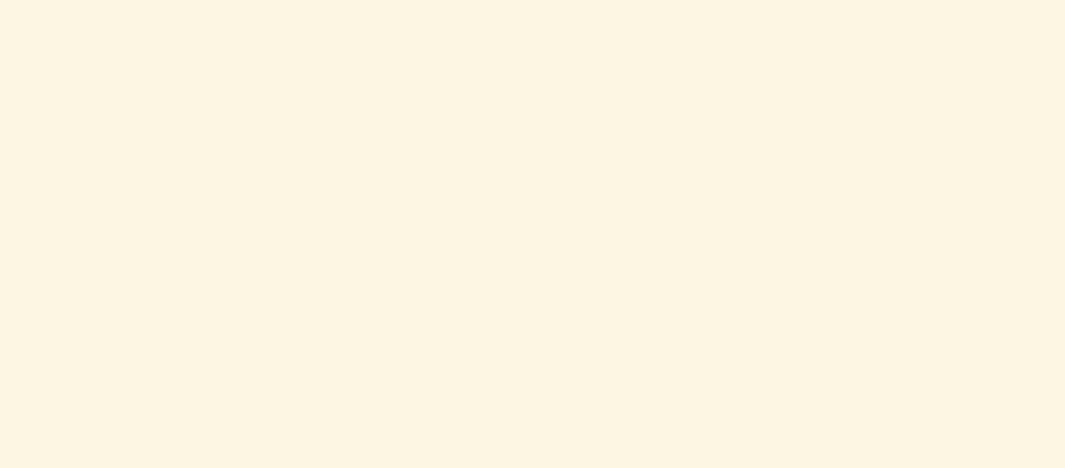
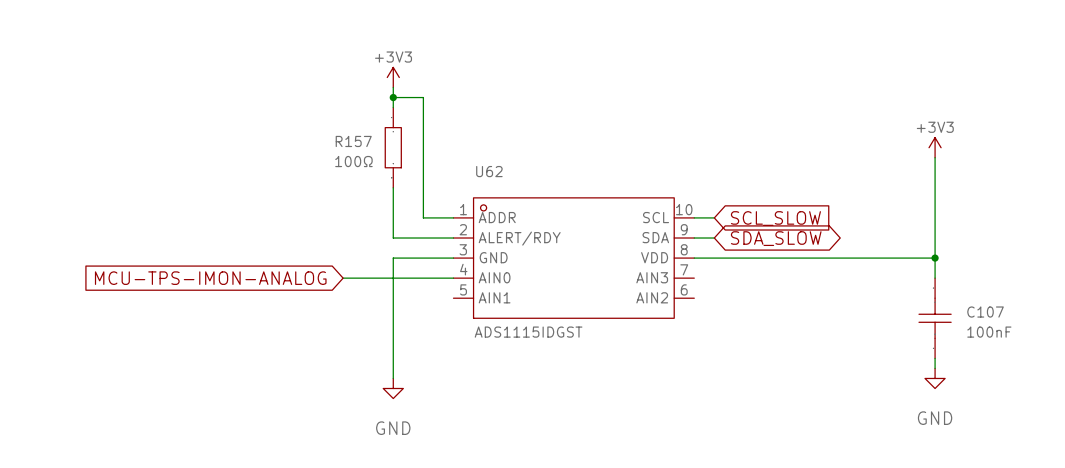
power symbol: none -> +3V3 (393, 77)
wire: none -> (393, 87) (393, 107)
wire: none -> (393, 97) (423, 97) (423, 217) (453, 217)
junction: none -> (393, 97)
R157: none -> 100Ω (393, 147)
power symbol: none -> +3V3 (935, 147)
wire: none -> (935, 157) (935, 278)
wire: none -> (393, 187) (393, 238) (453, 238)
wire: none -> (694, 217) (714, 217)
global label: none -> SCL_SLOW (775, 218)
wire: none -> (694, 238) (714, 238)
global label: none -> SDA_SLOW (776, 238)
wire: none -> (453, 258) (393, 258) (393, 378)
U62: none -> ADS1115IDGST (573, 258)
wire: none -> (694, 258) (935, 258)
junction: none -> (935, 258)
global label: none -> MCU-TPS-IMON-ANALOG (210, 278)
wire: none -> (343, 278) (453, 278)
C107: none -> 100nF (935, 318)
wire: none -> (935, 358) (935, 368)
power symbol: none -> GND (935, 378)
power symbol: none -> GND (393, 388)

